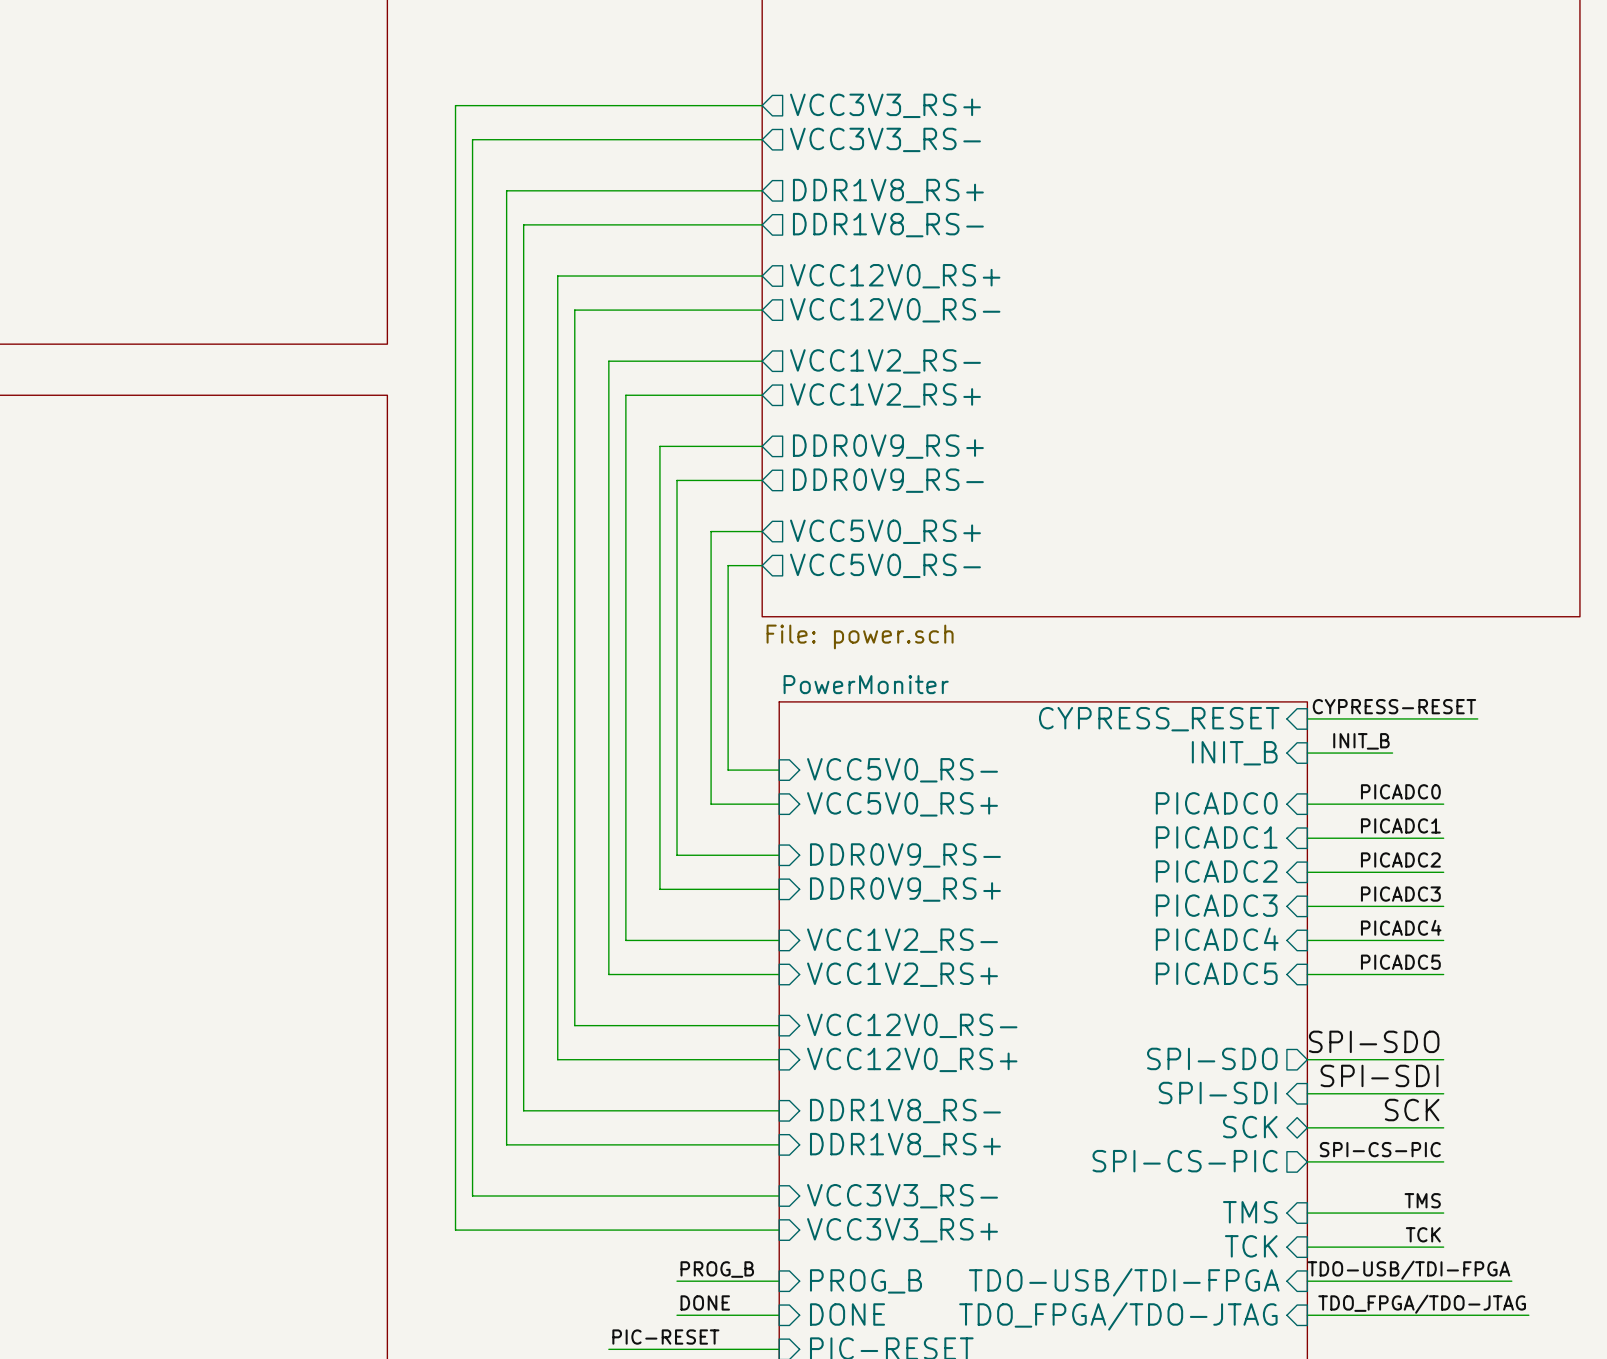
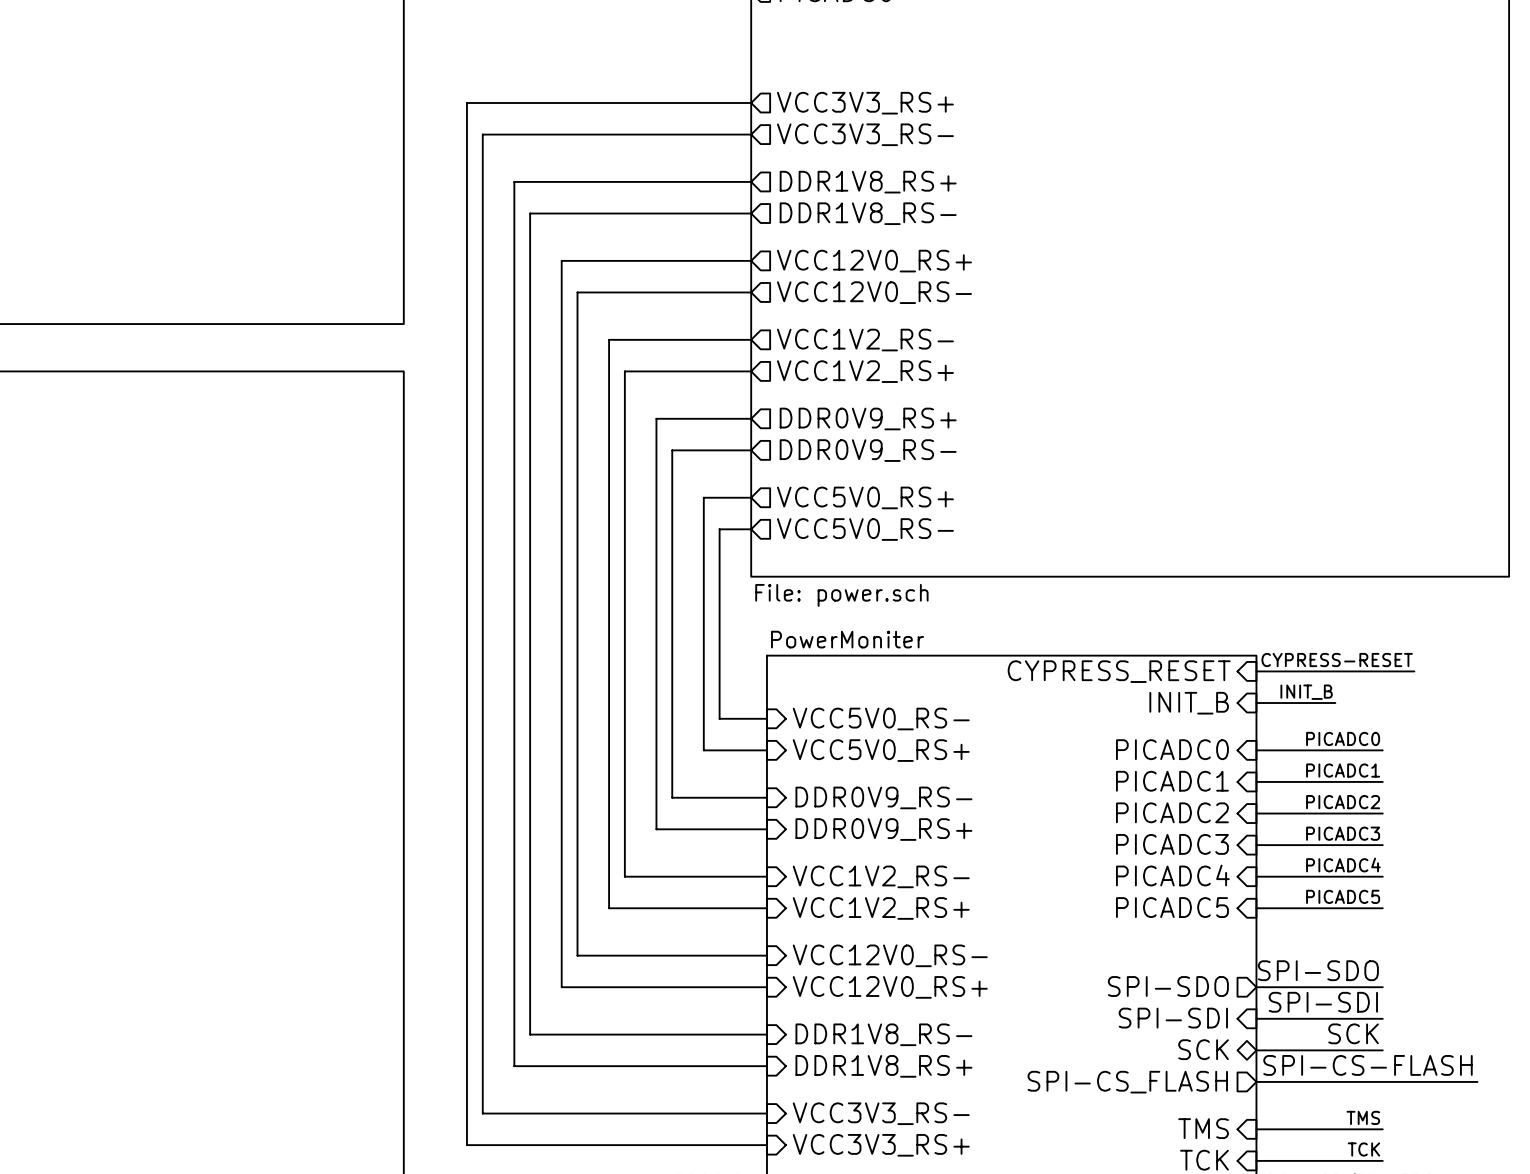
label: SPI-CS-PIC (1380, 1149) -> SPI-CS-FLASH (1368, 1065)
sheet pin: SPI-CS-PIC (1185, 1161) -> SPI-CS_FLASH (1127, 1082)
wire: none -> (1382, 1081) (1477, 1081)

